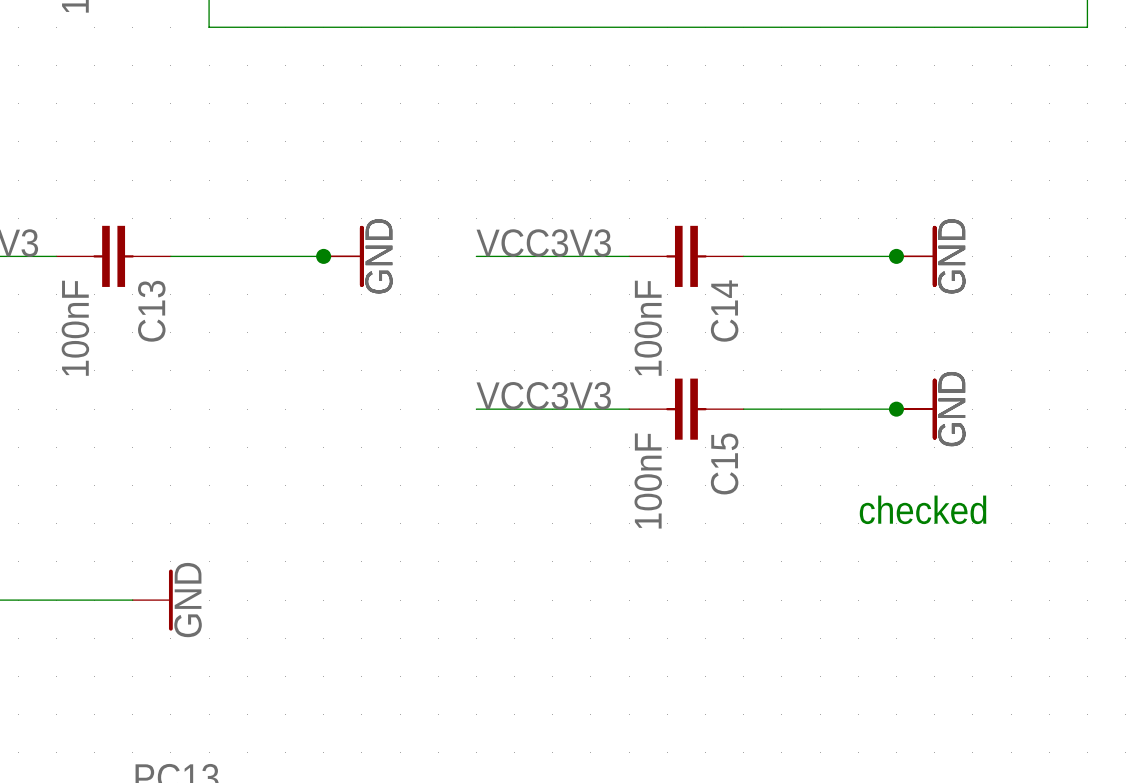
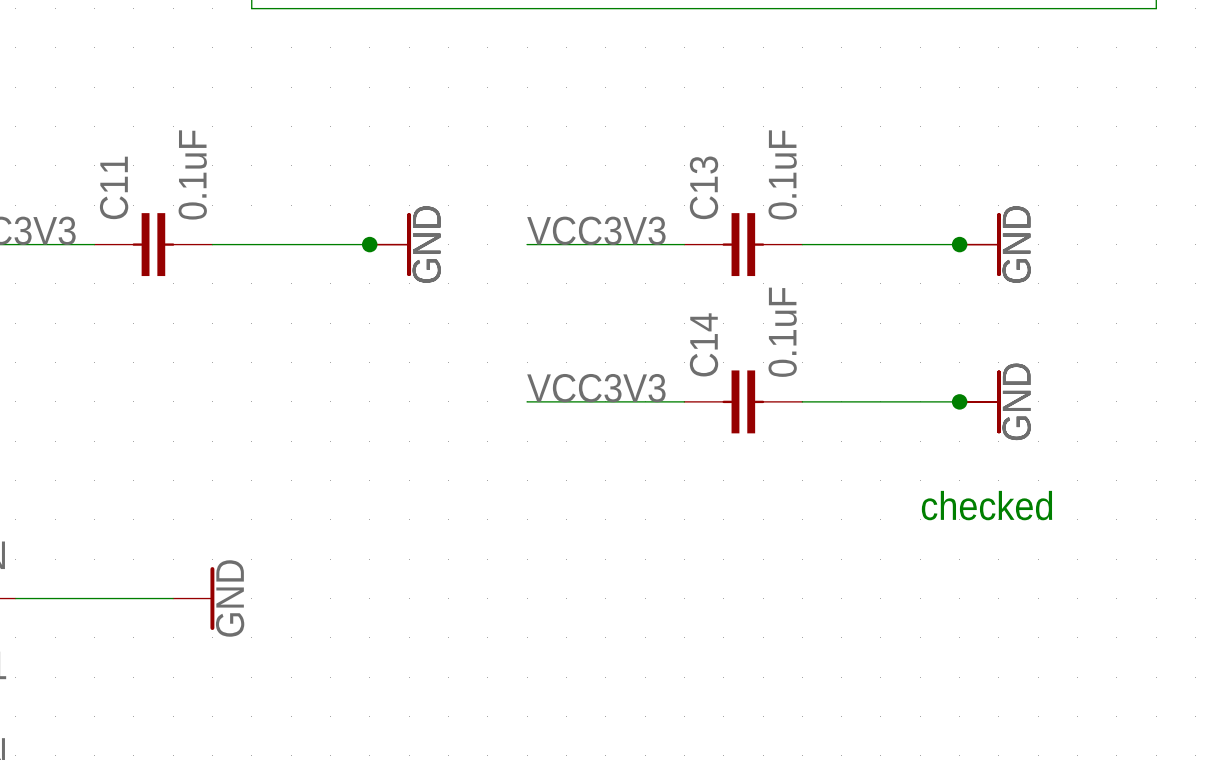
C13 name: C13 (151, 311) -> C11 (114, 187)
C14 name: C14 (724, 311) -> C13 (704, 187)
C13 value: 100nF (75, 328) -> 0.1uF (192, 174)
C14 value: 100nF (648, 328) -> 0.1uF (782, 174)
C15 name: C15 (724, 463) -> C14 (704, 344)
C15 value: 100nF (648, 481) -> 0.1uF (782, 332)

